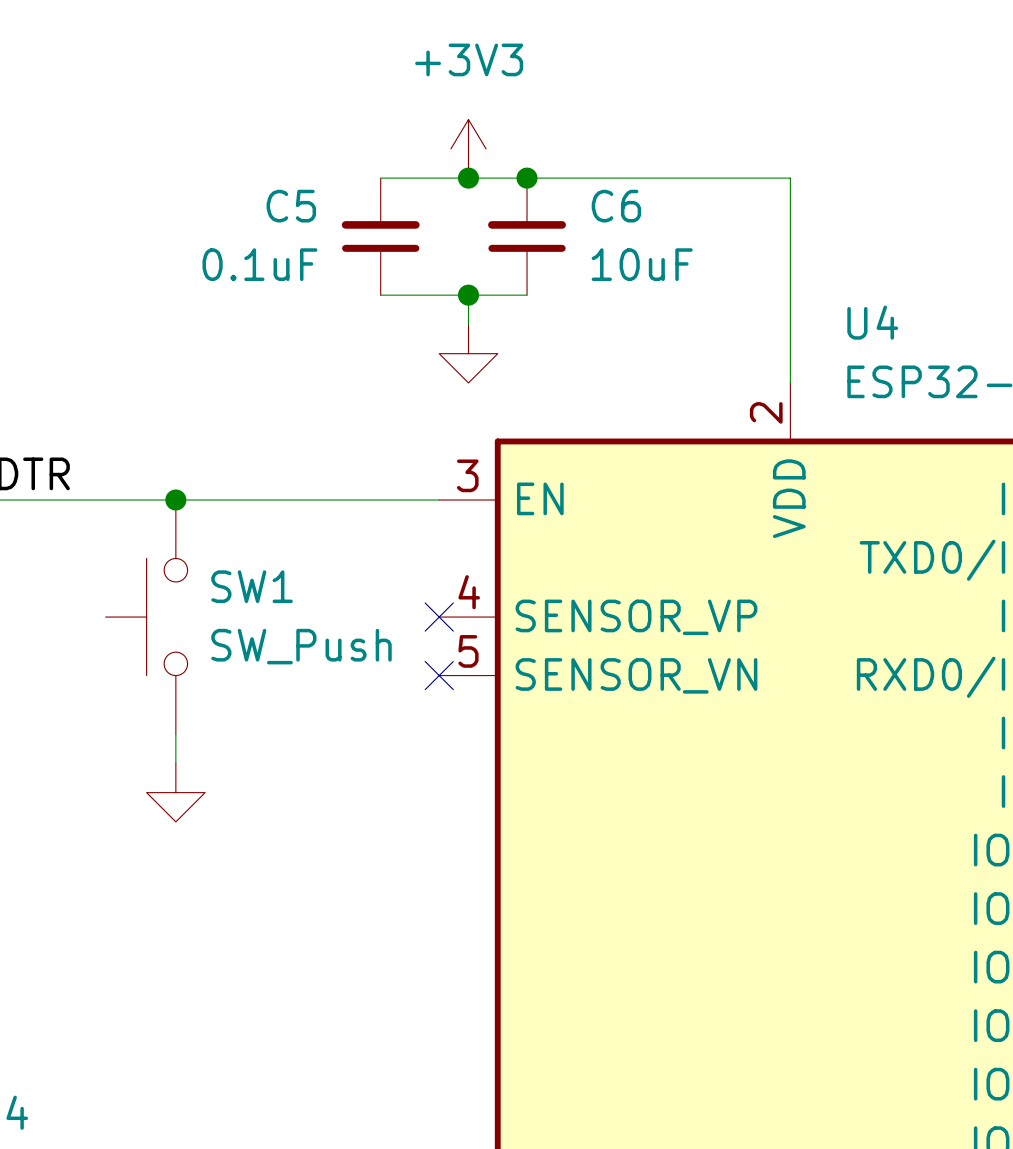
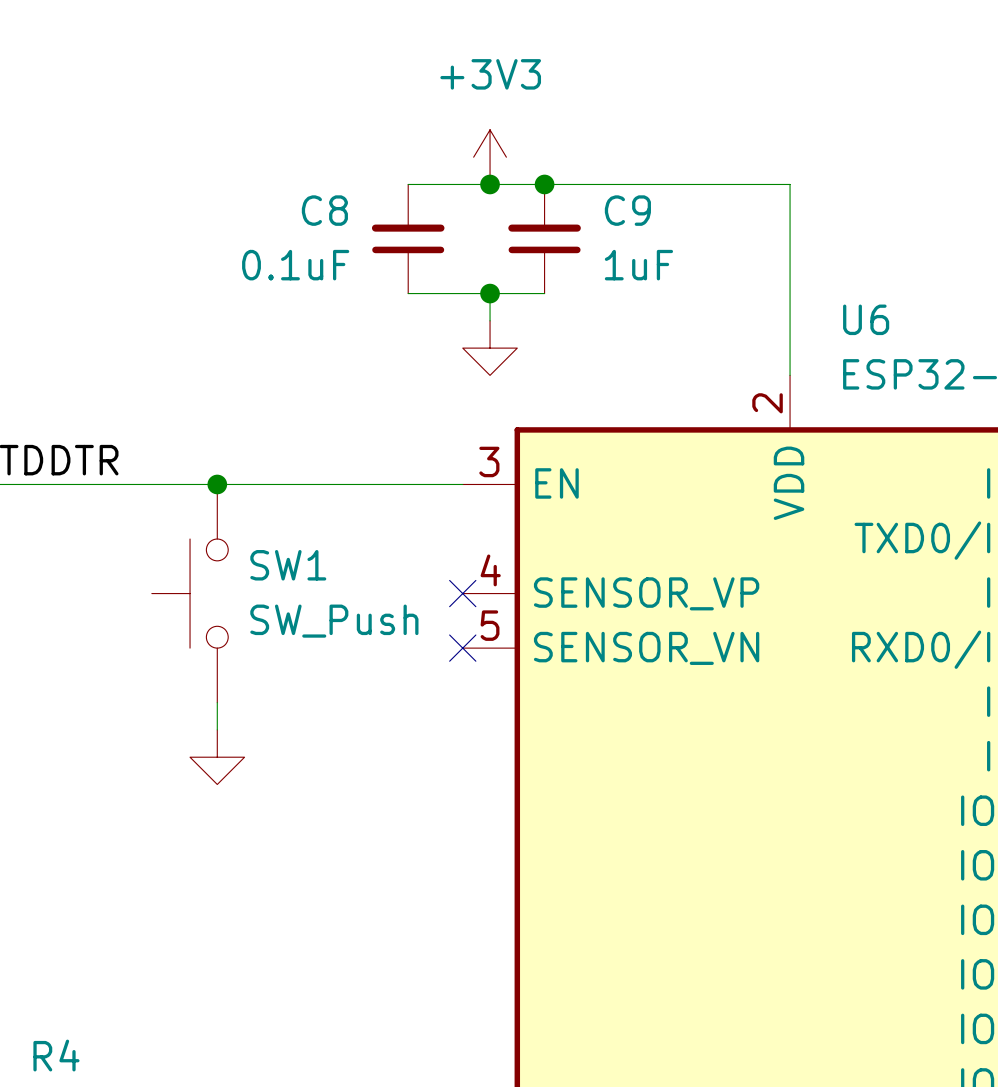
C5 name: C5 (291, 206) -> C8 (324, 210)
C6 name: C6 (616, 206) -> C9 (627, 210)
C6 value: 10uF (642, 264) -> 1uF (638, 265)
U4 name: U4 (872, 322) -> U6 (866, 319)

